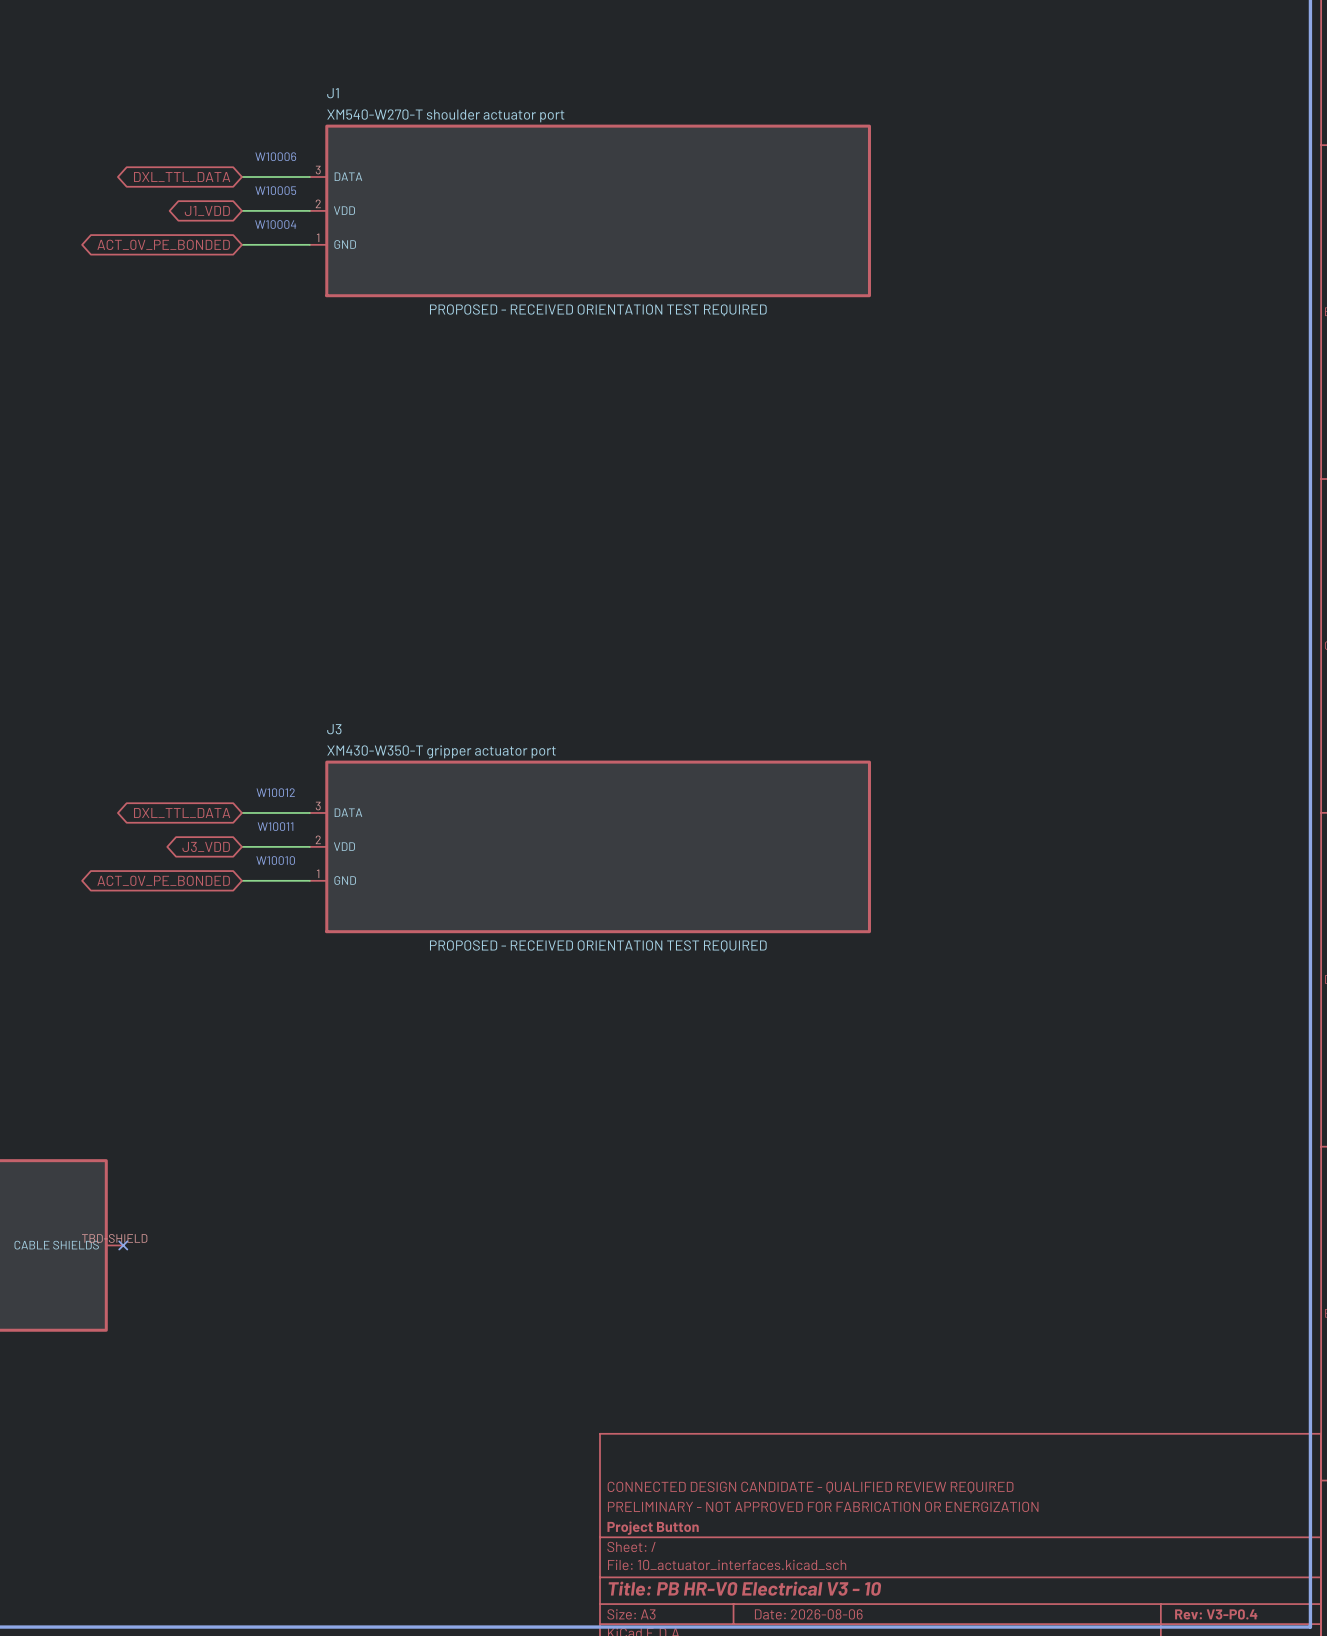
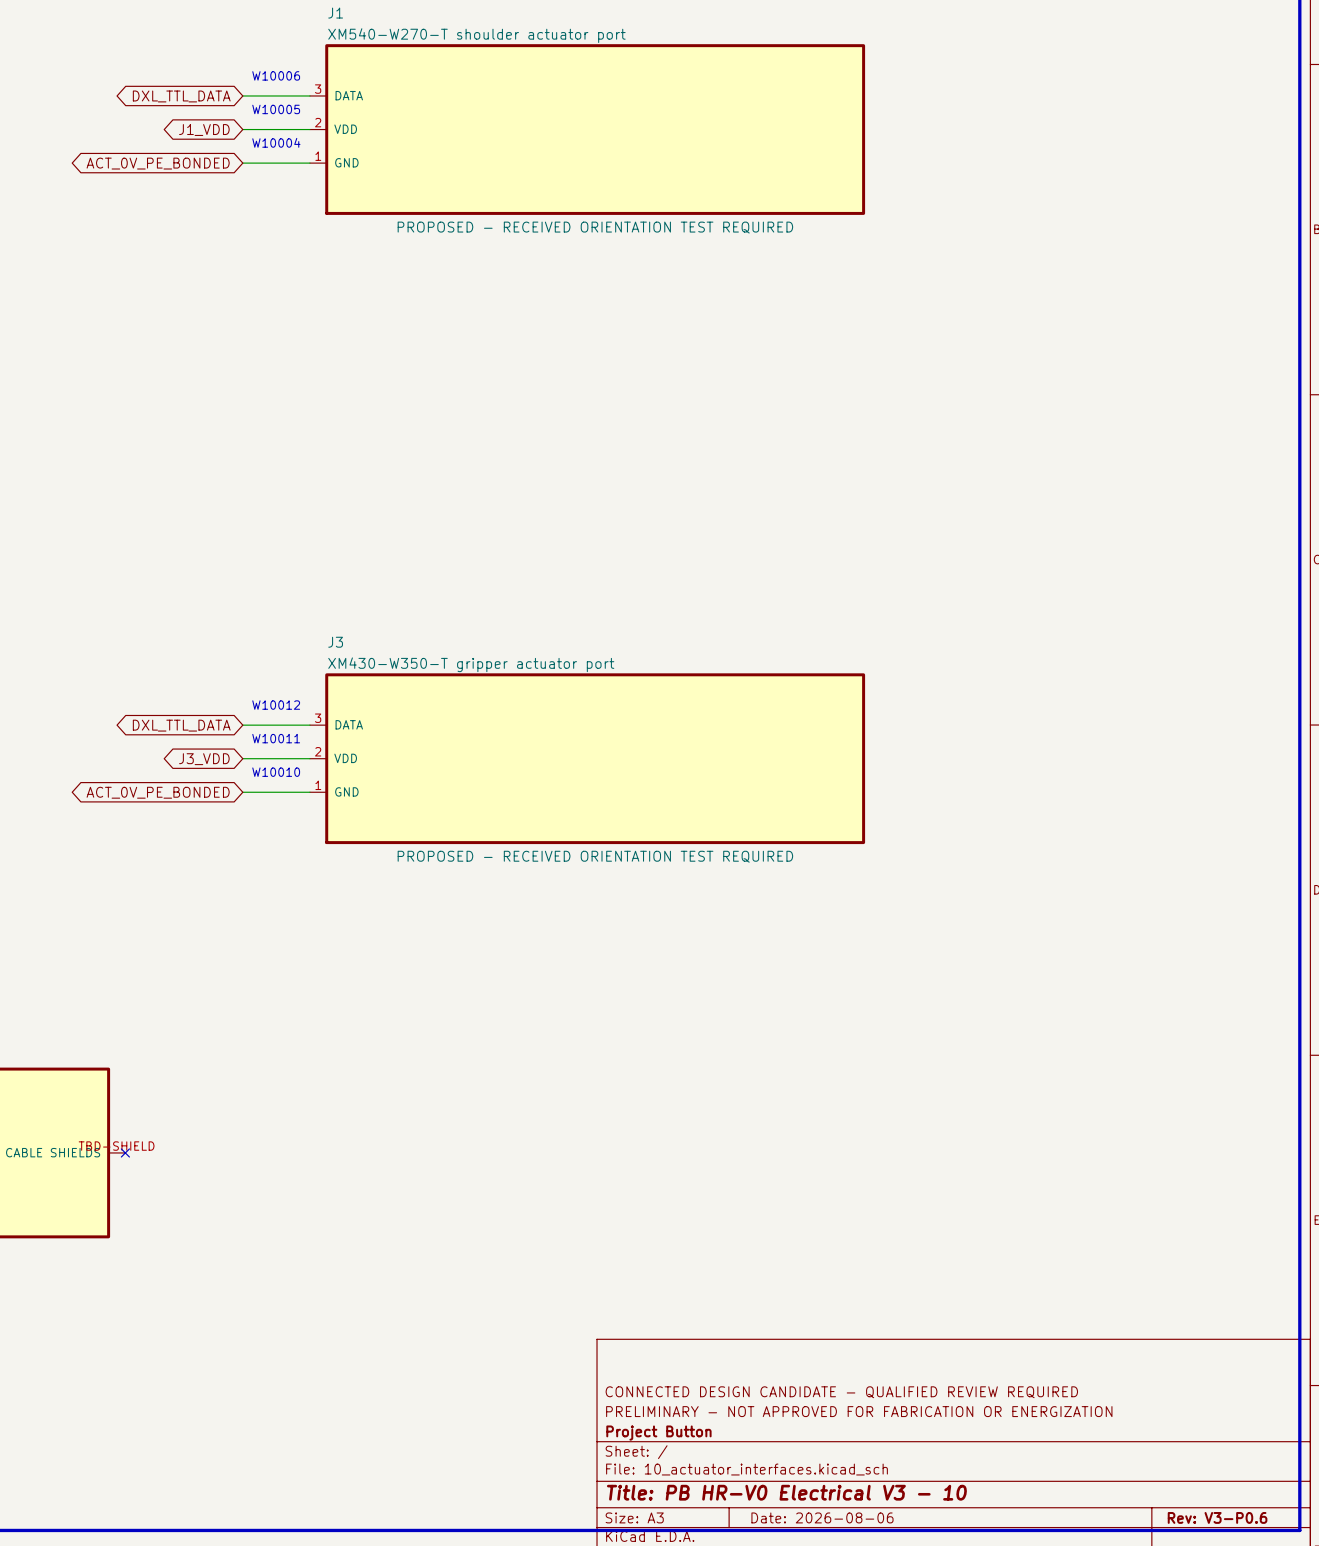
title block: Rev: V3-P0.4 (1216, 1614) -> Rev: V3-P0.6 (1217, 1517)

